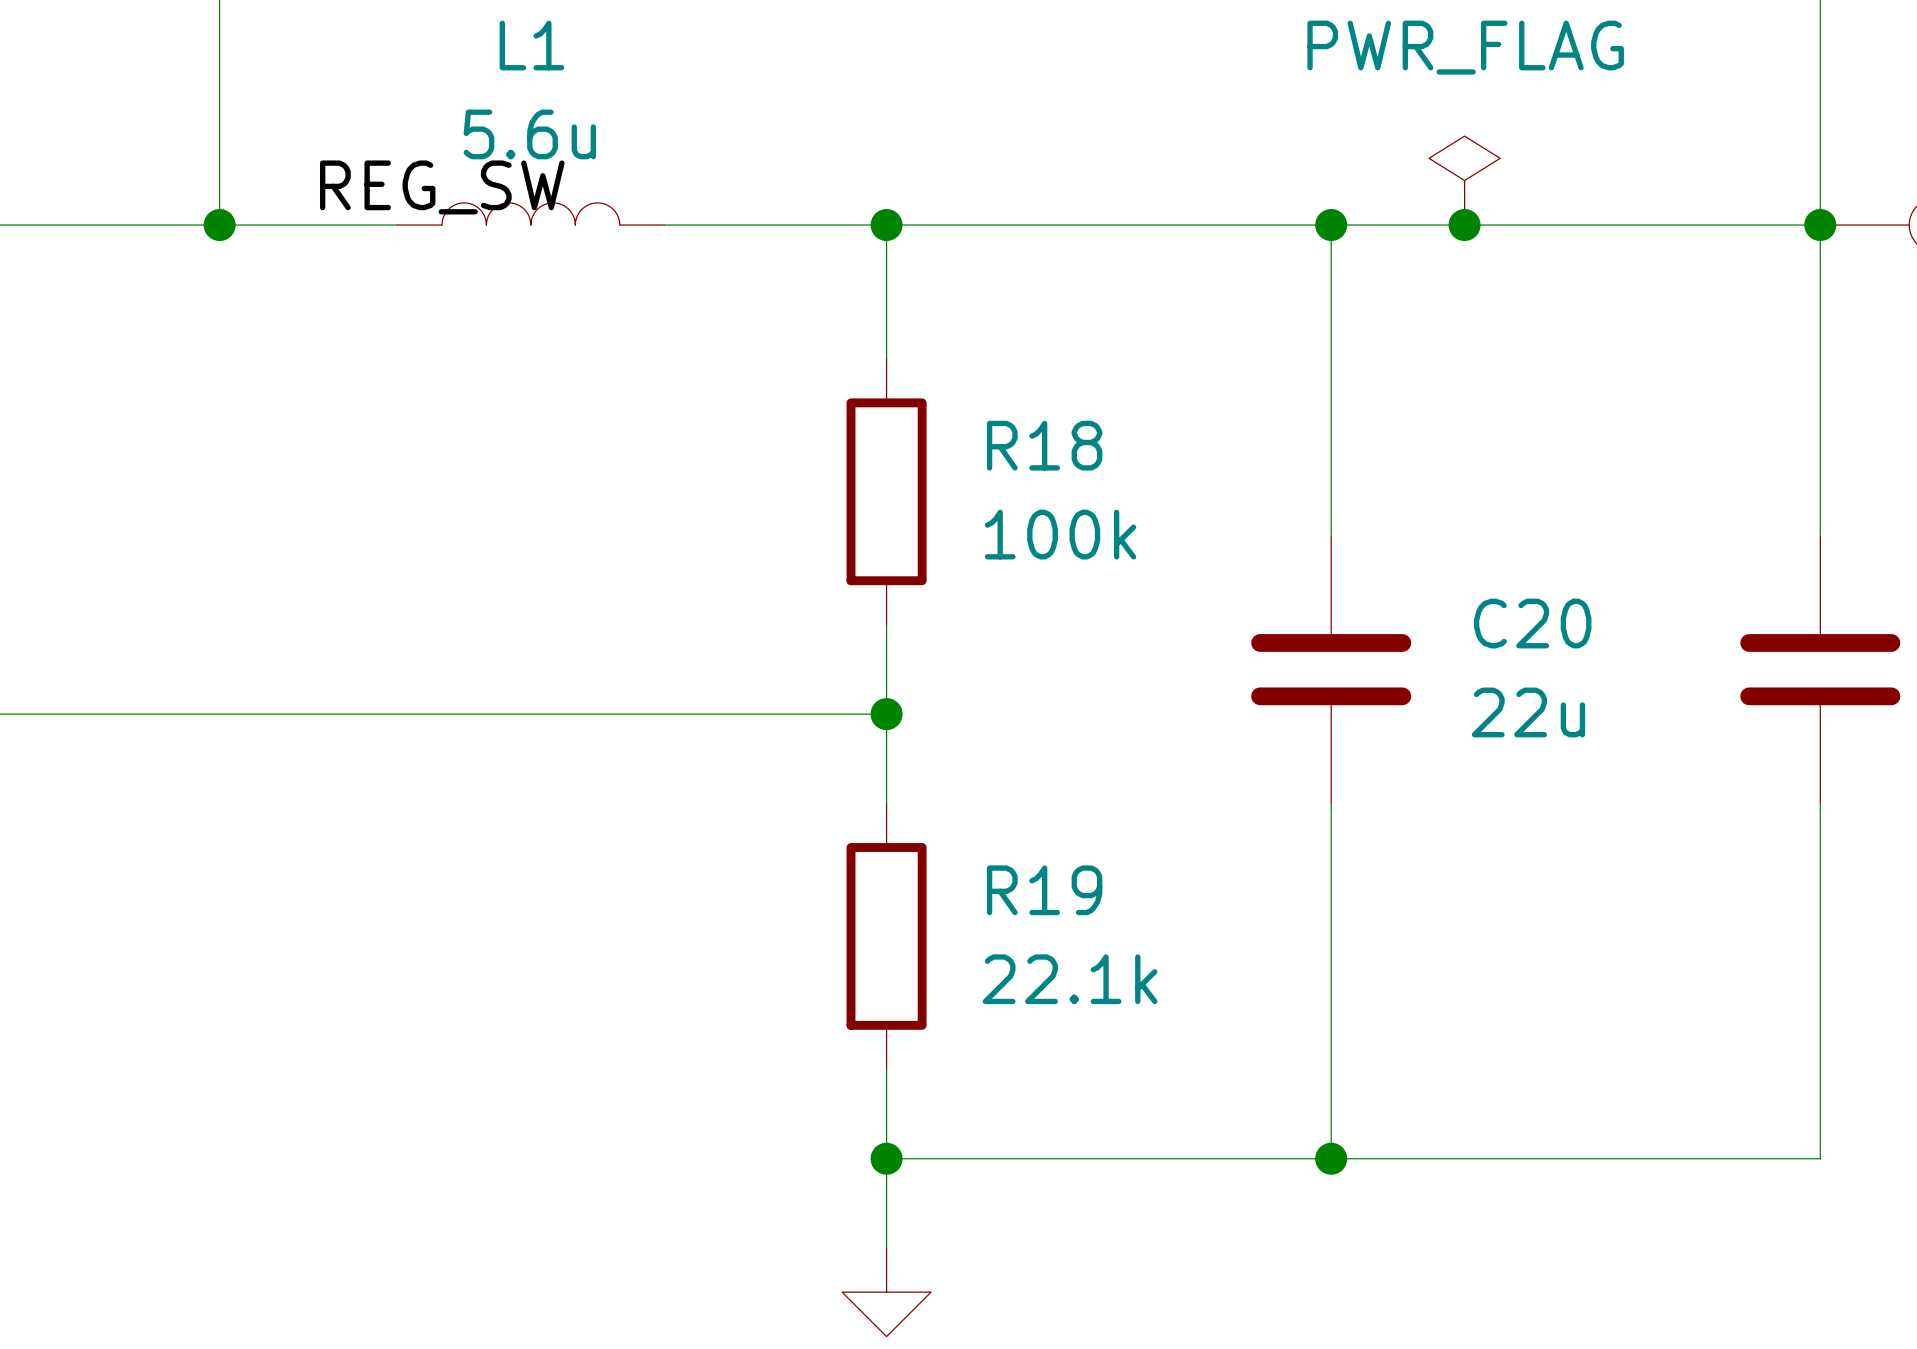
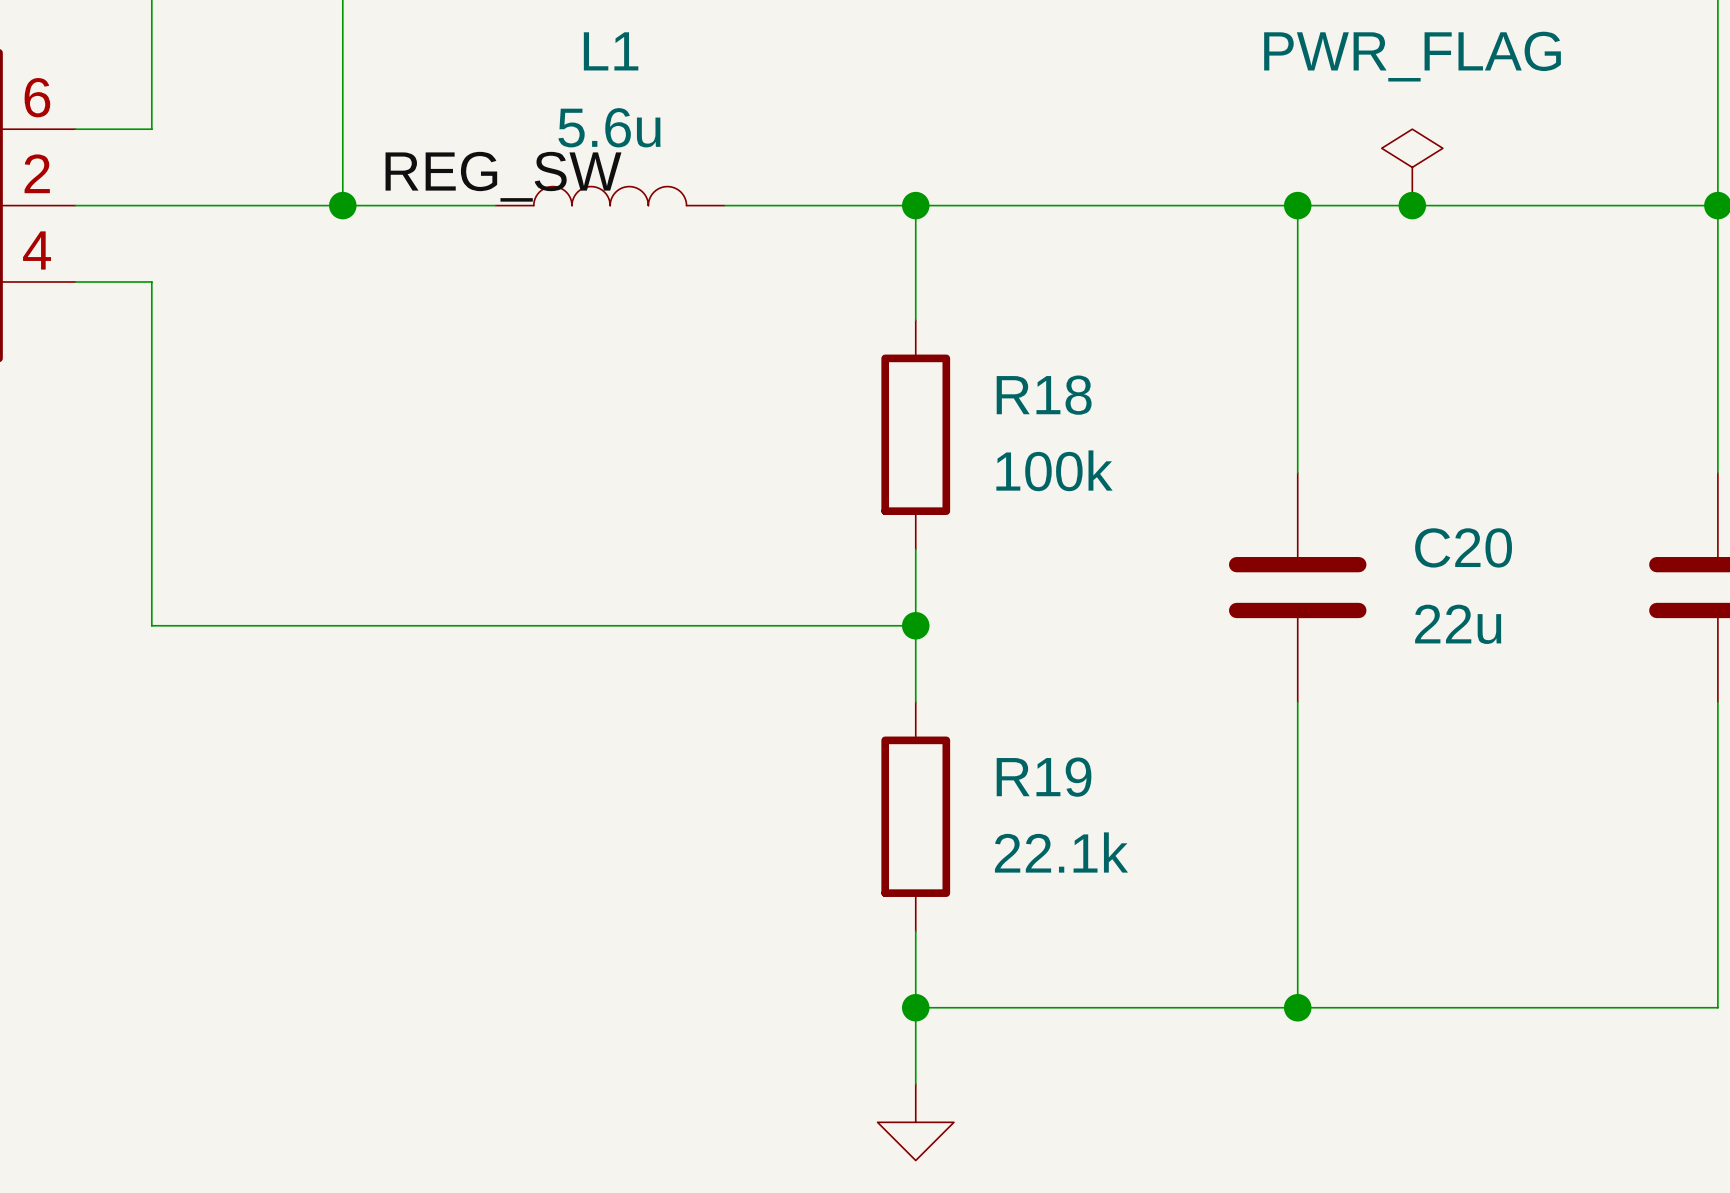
label position: REG_SW (442, 187) -> REG_SW (503, 176)

